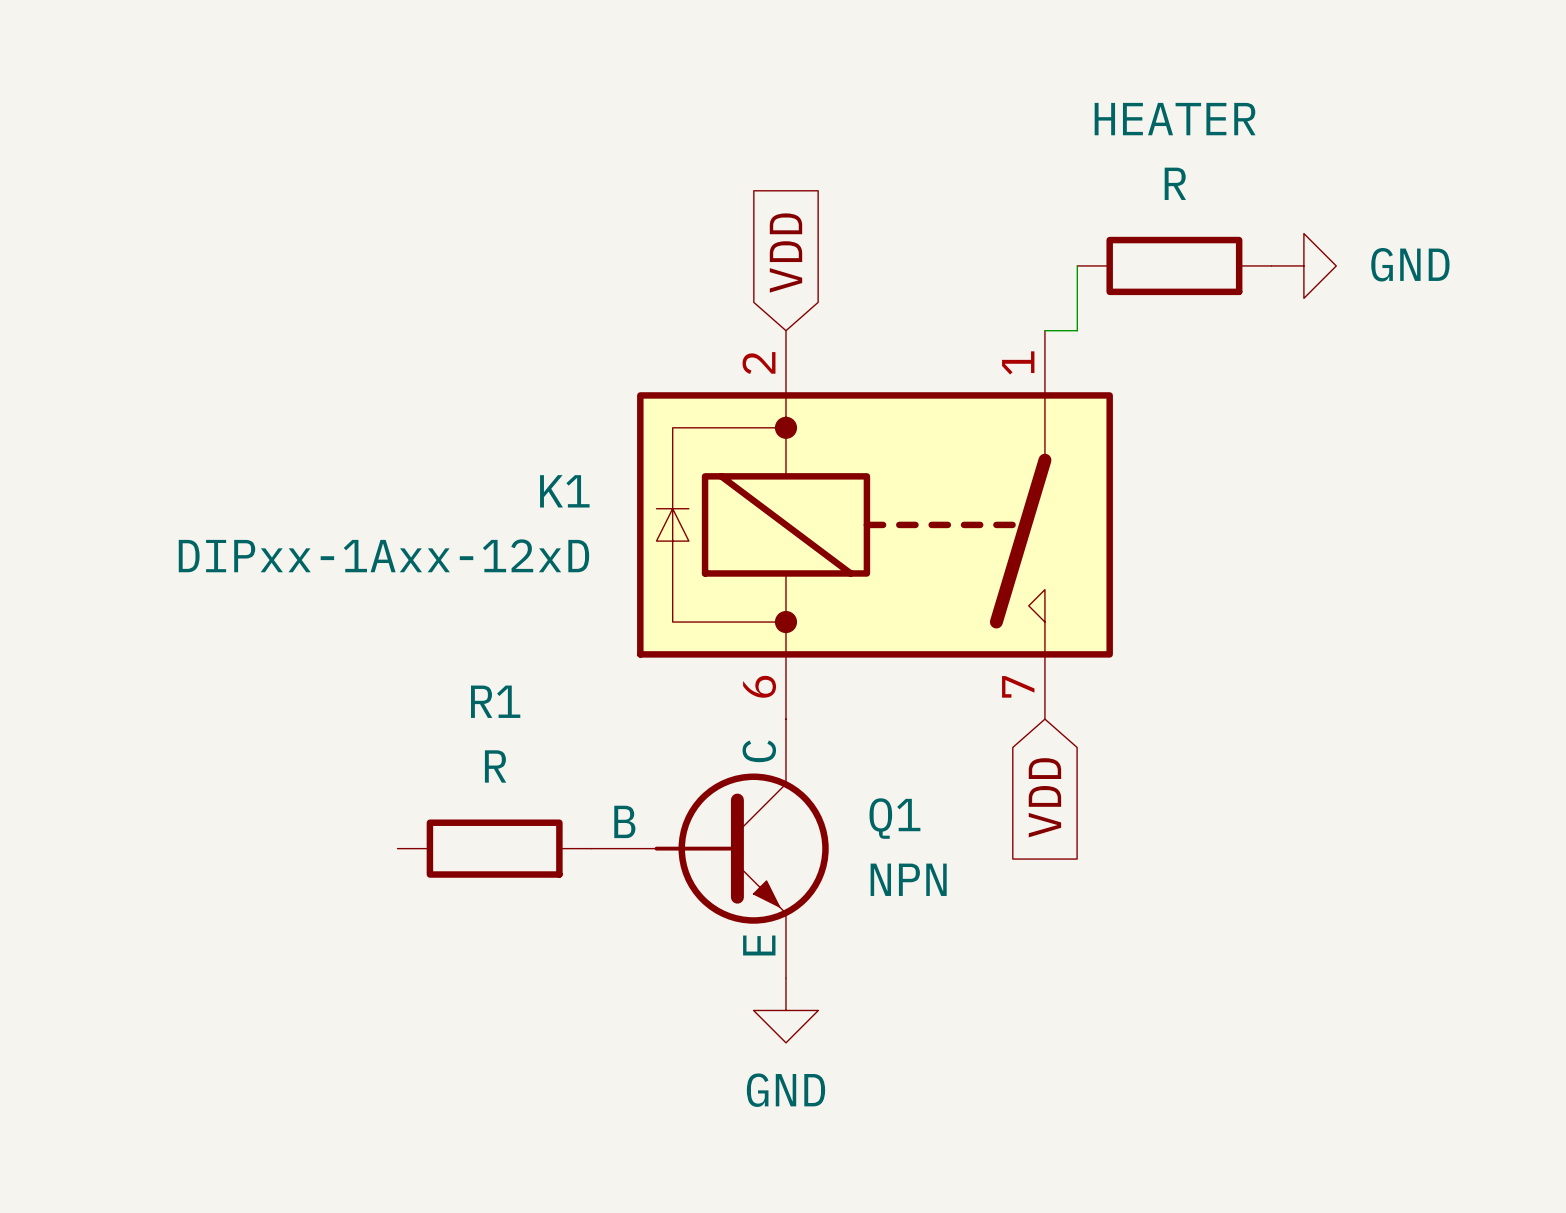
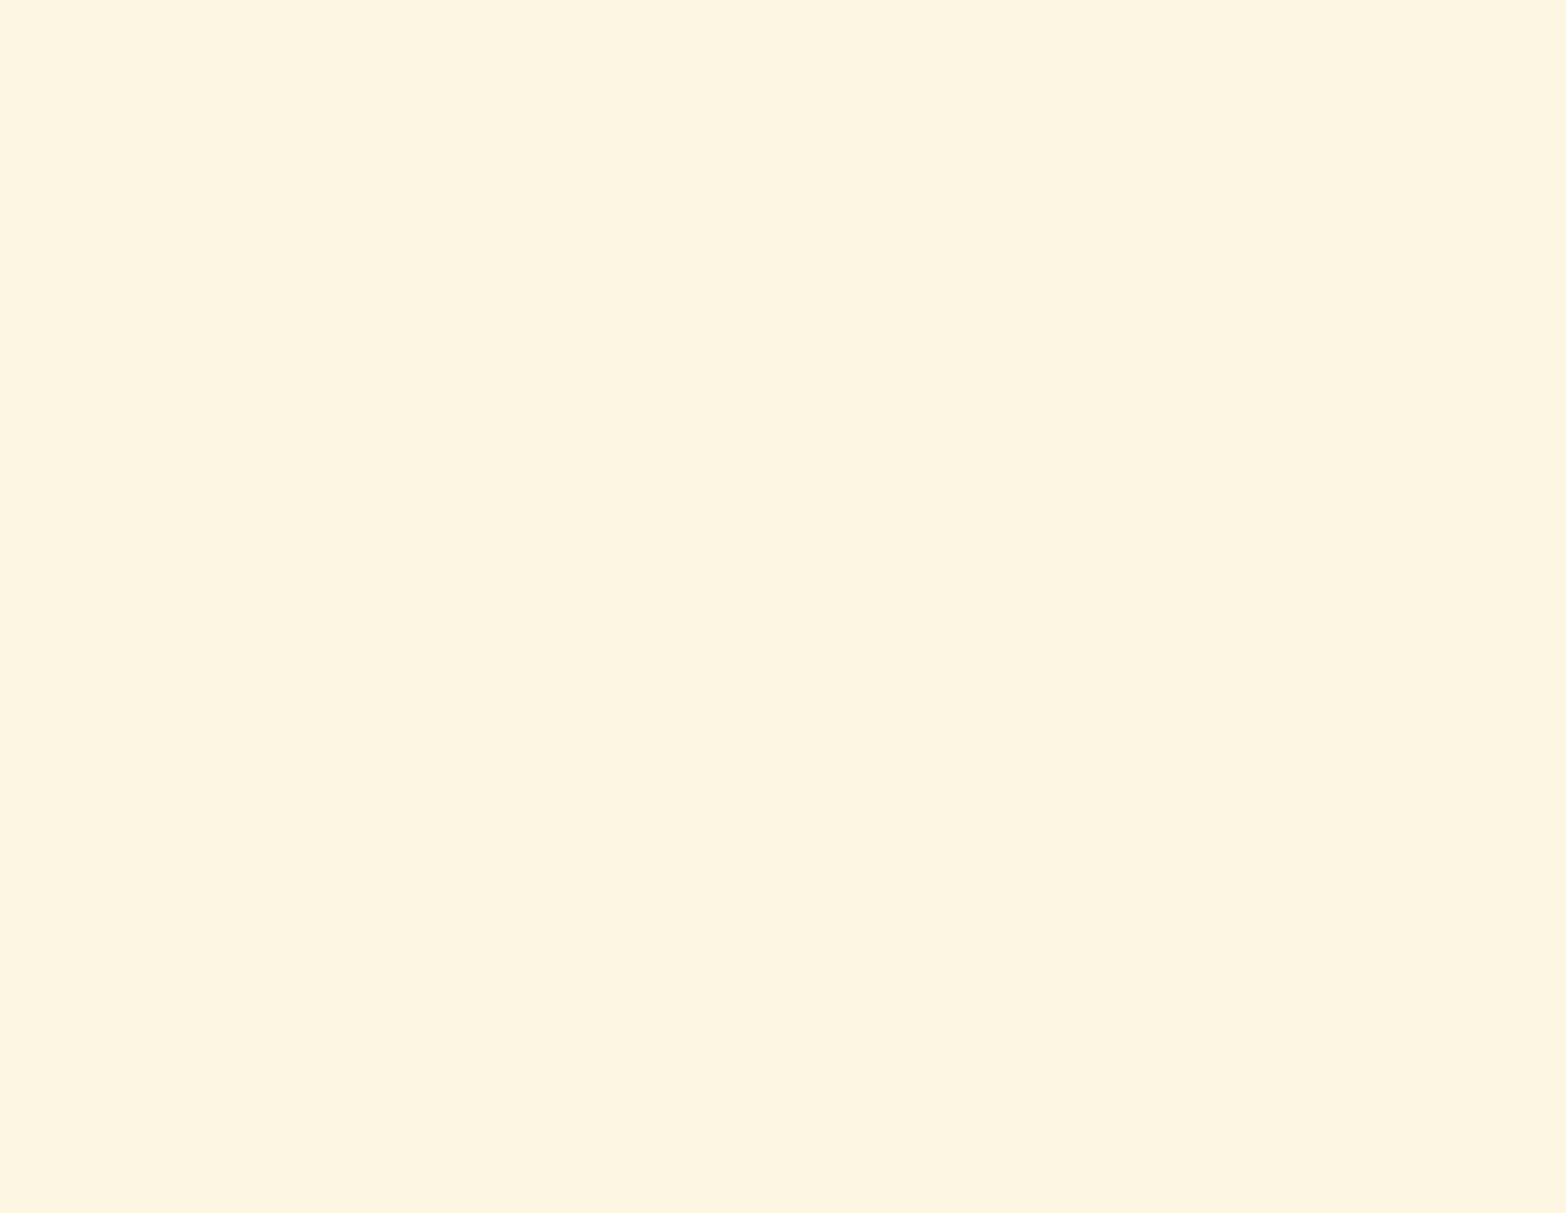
global label: VDD (785, 253) -> none
wire: (1077, 265) (1077, 330) (1044, 330) -> none
HEATER: R (1174, 265) -> none
power symbol: GND (1303, 265) -> none
K1: DIPxx-1Axx-12xD (875, 524) -> none
global label: VDD (1044, 797) -> none
R1: R (494, 848) -> none
Q1: NPN (710, 848) -> none
power symbol: GND (785, 1010) -> none

